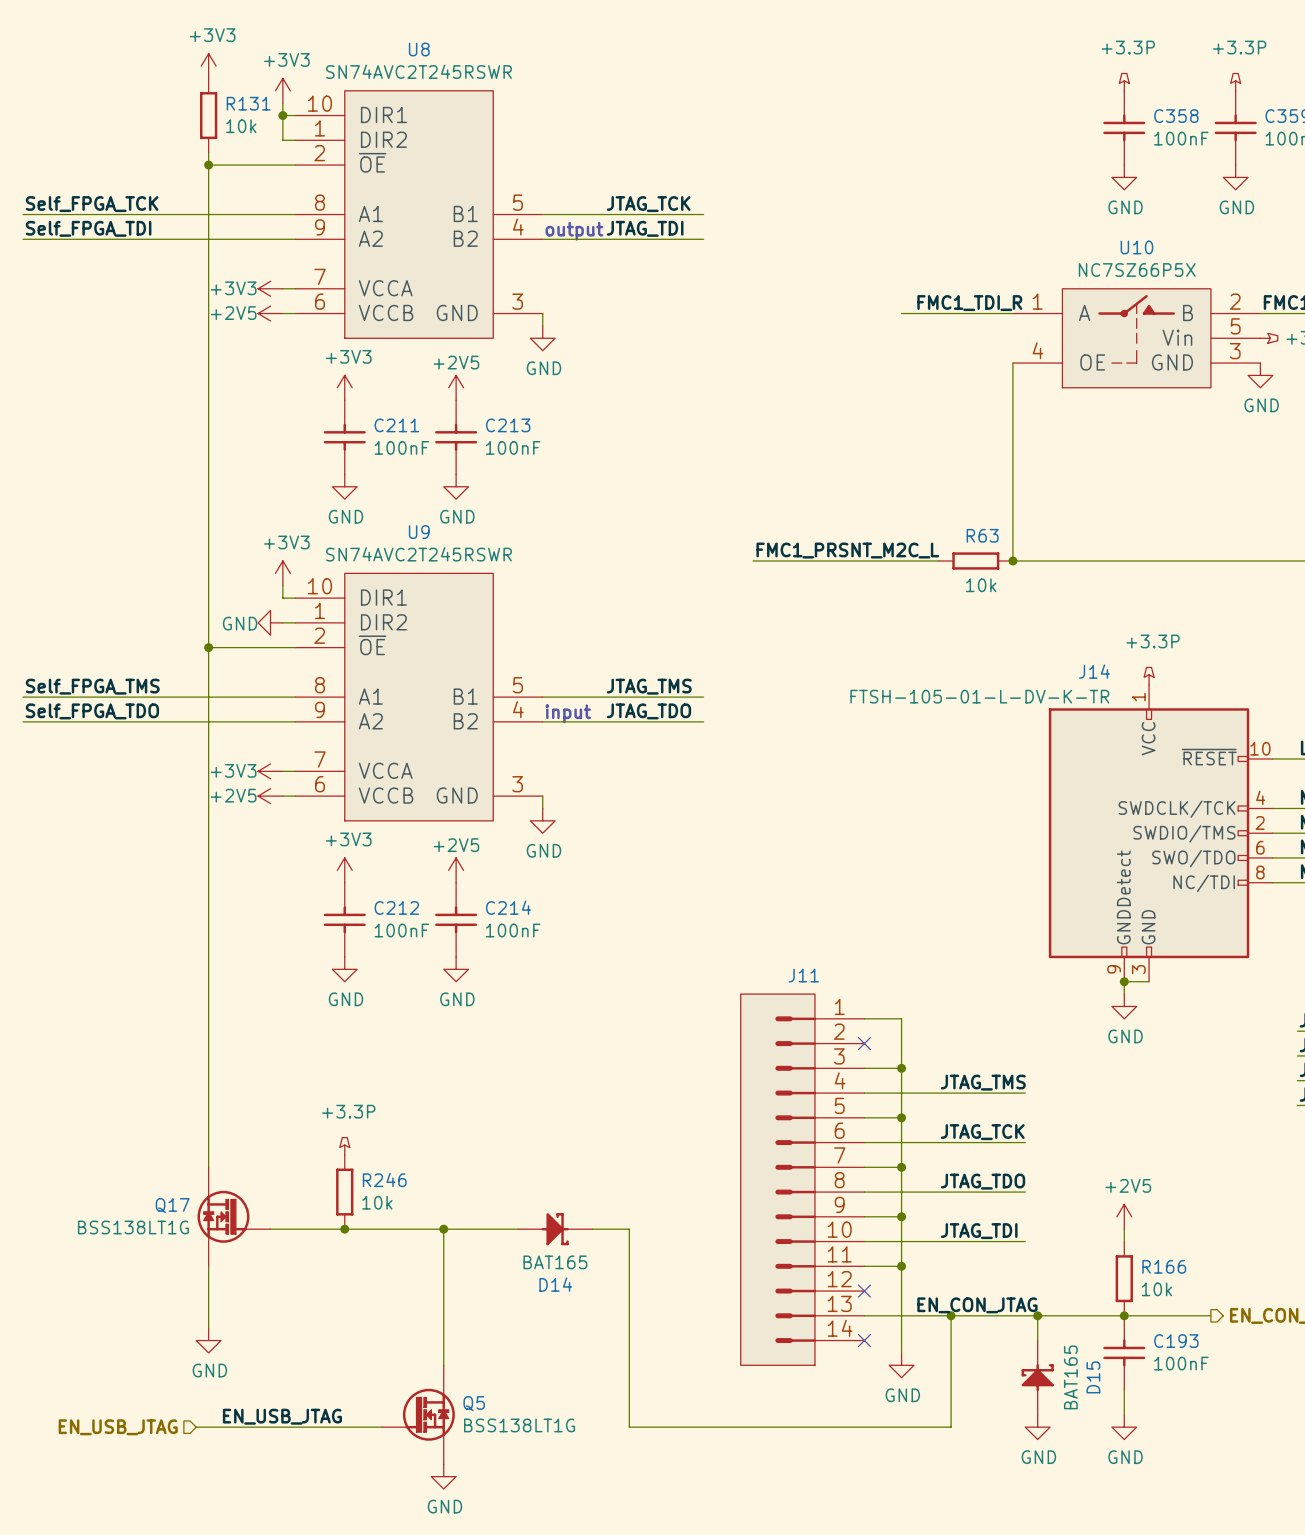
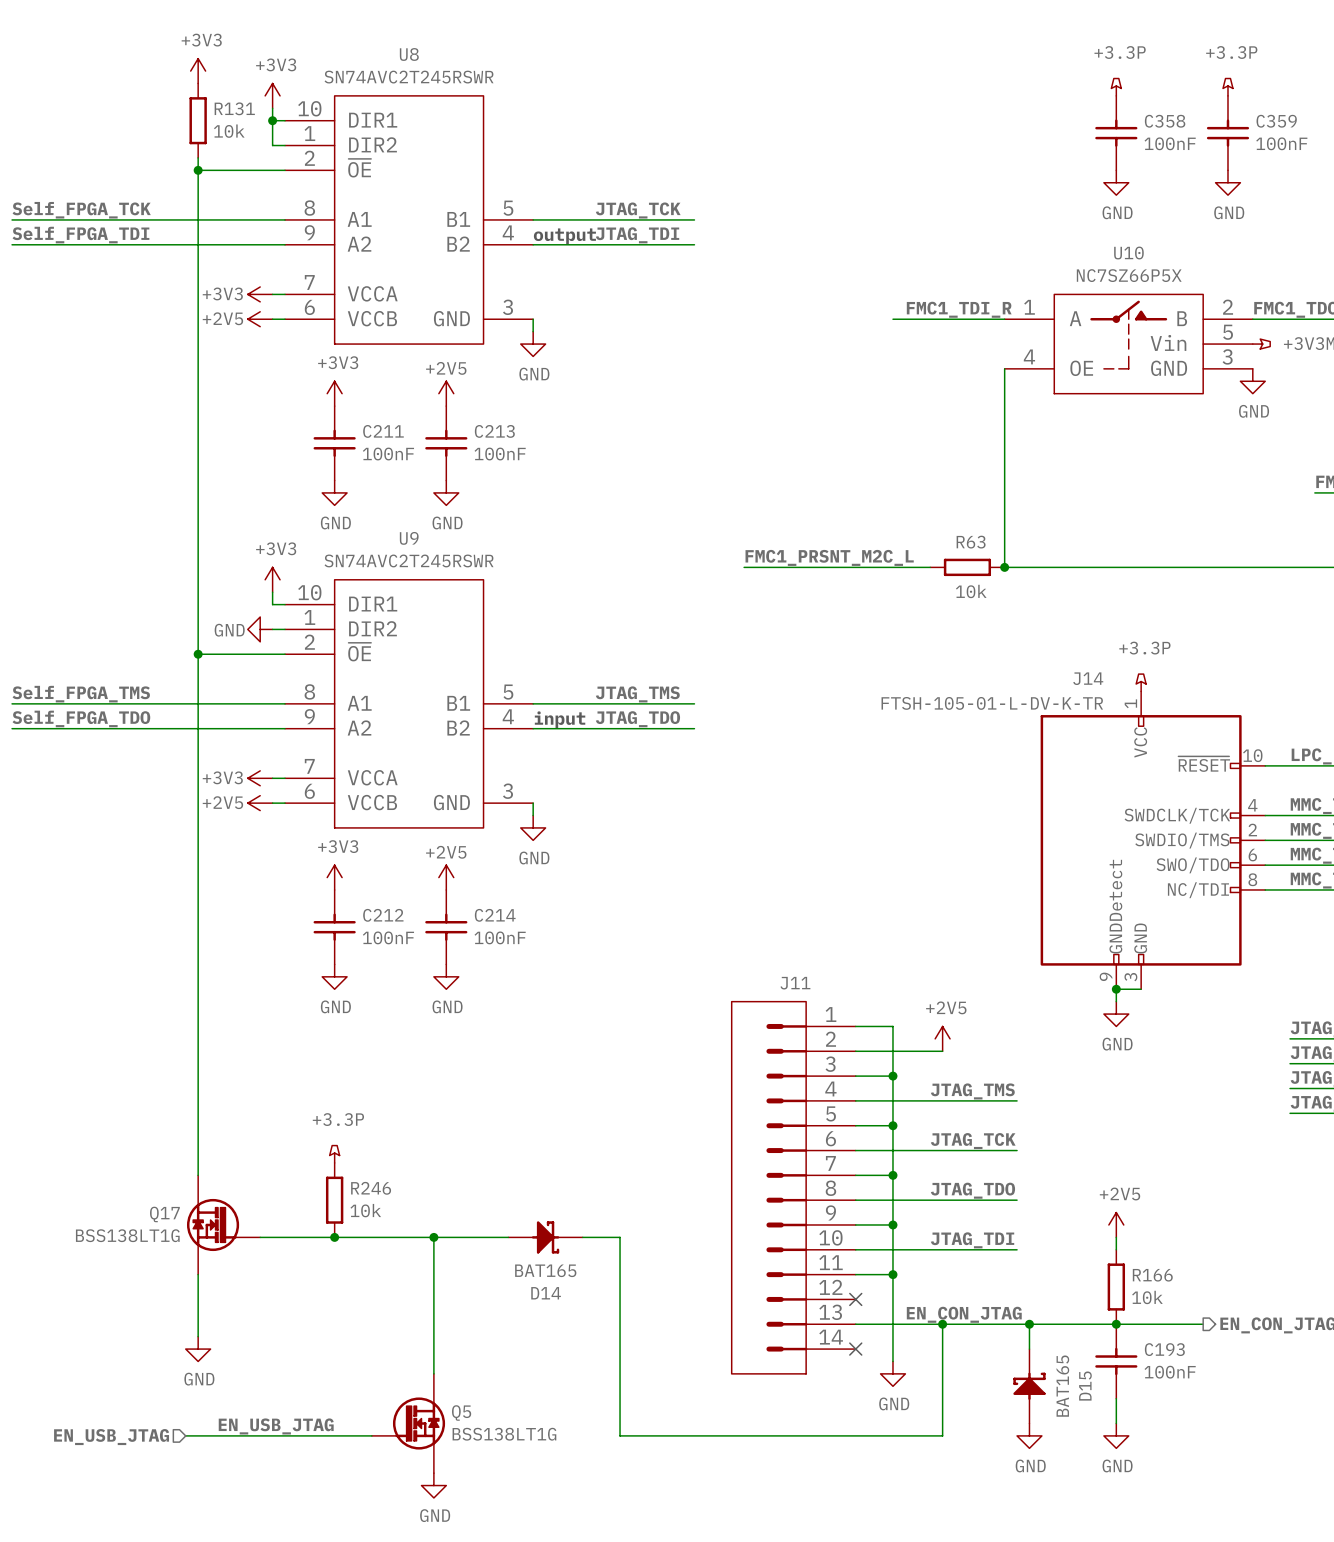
power symbol: none -> +2V5 (942, 1038)
wire: none -> (855, 1051) (942, 1051)
no-connect mark: (864, 1043) -> none

